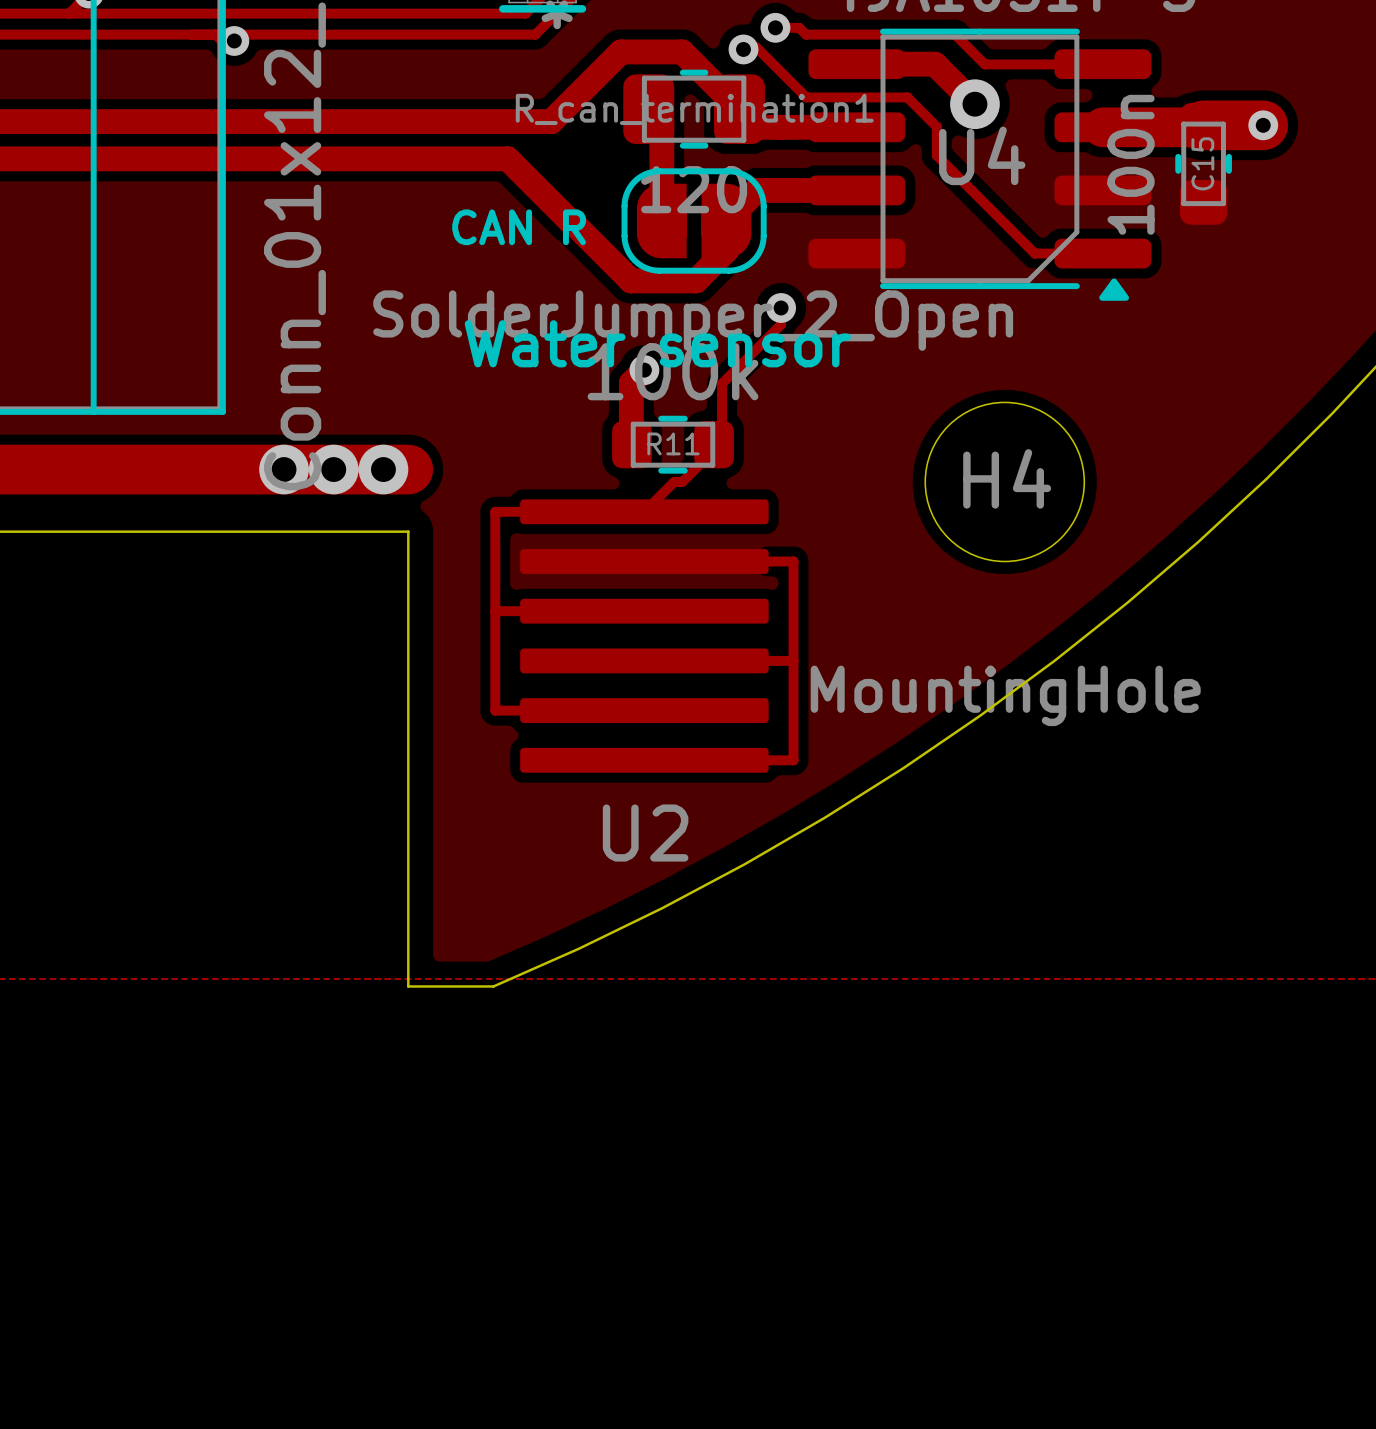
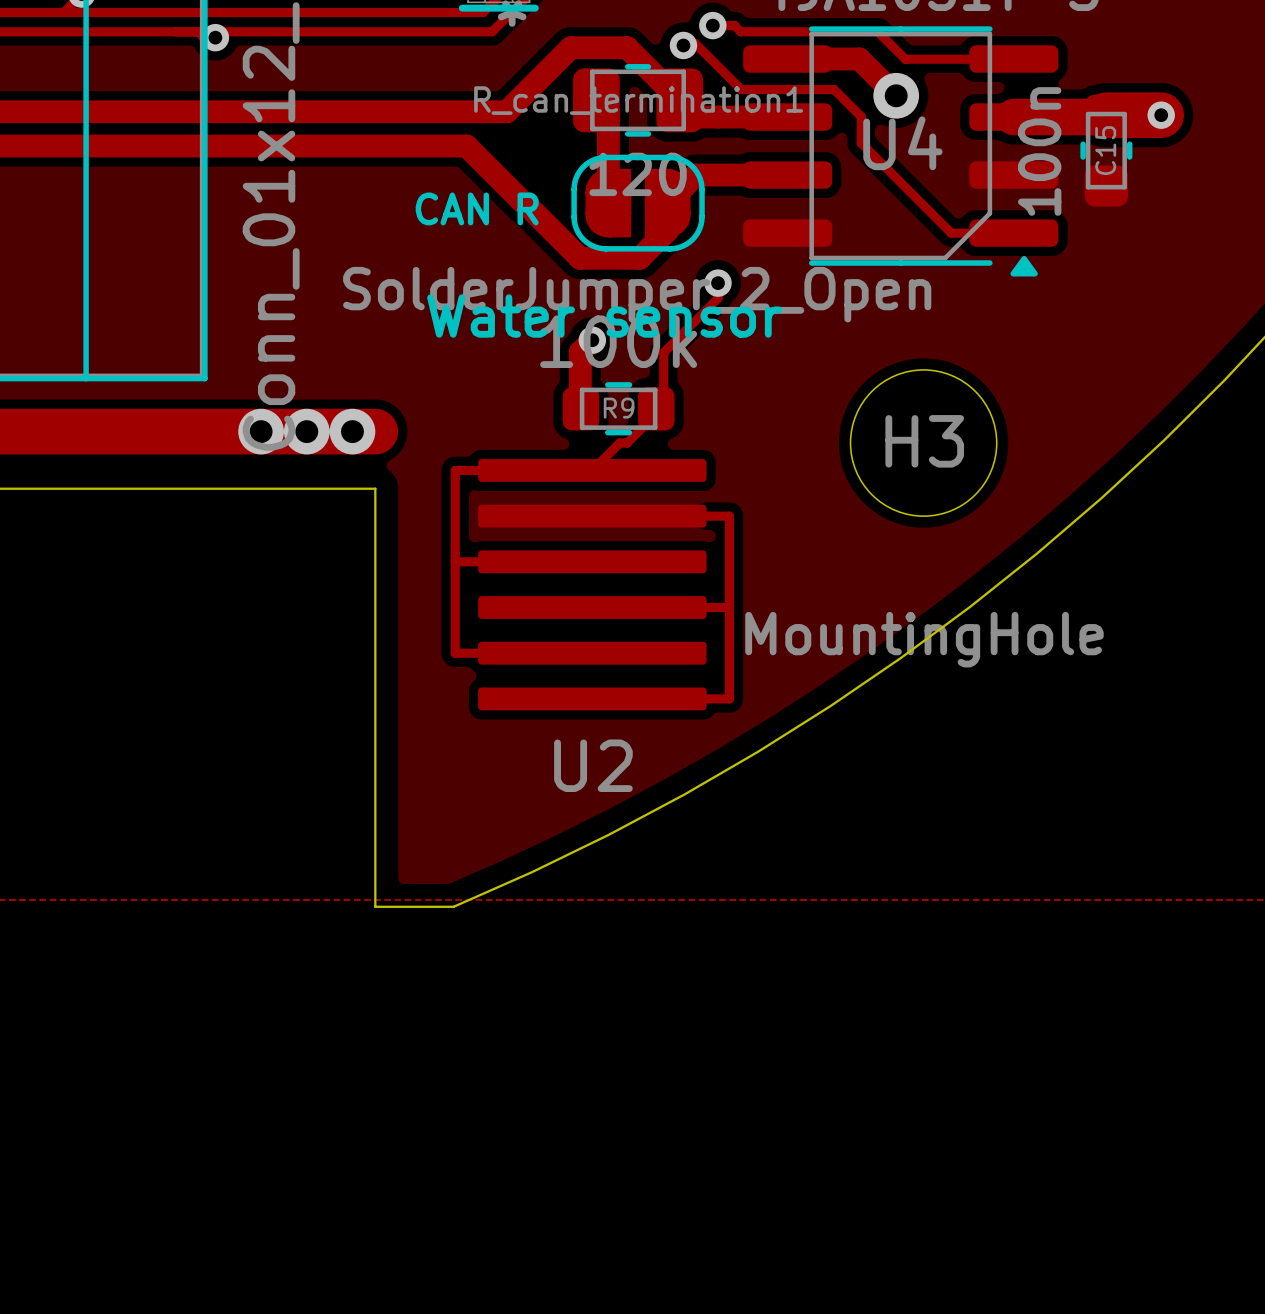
R11 name: R11 (673, 443) -> R9 (619, 408)
H4 name: H4 (1007, 478) -> H3 (924, 441)

